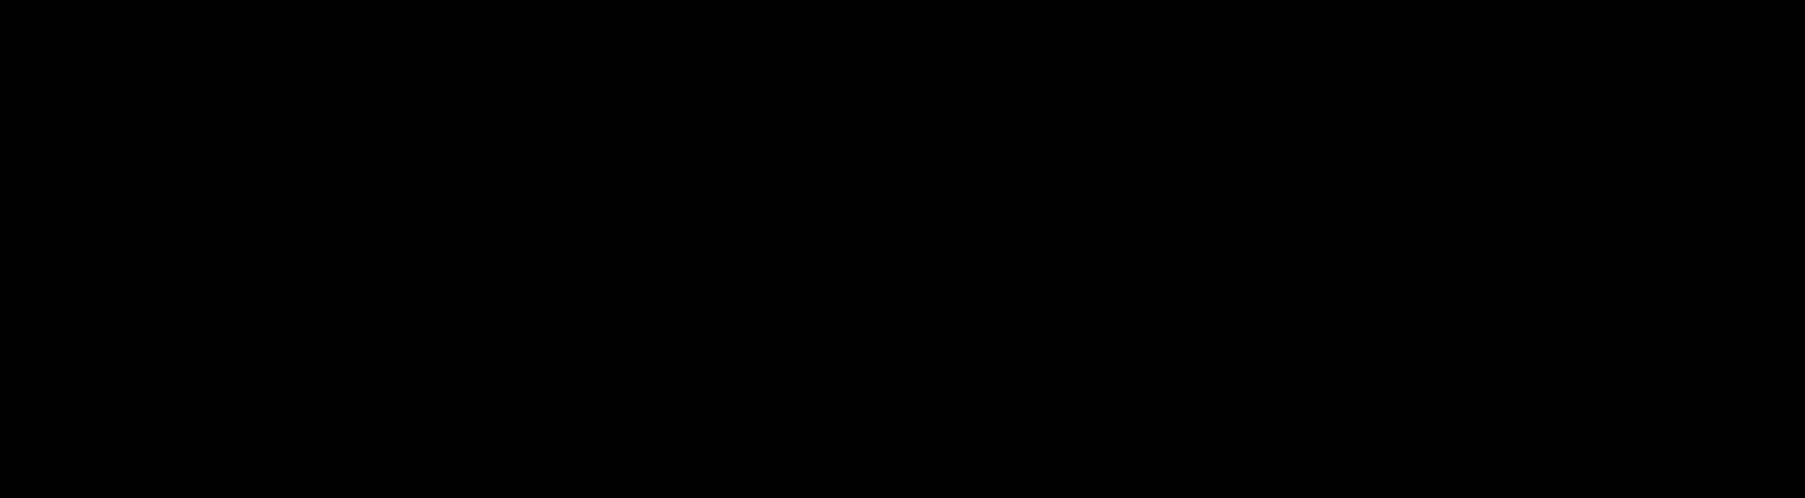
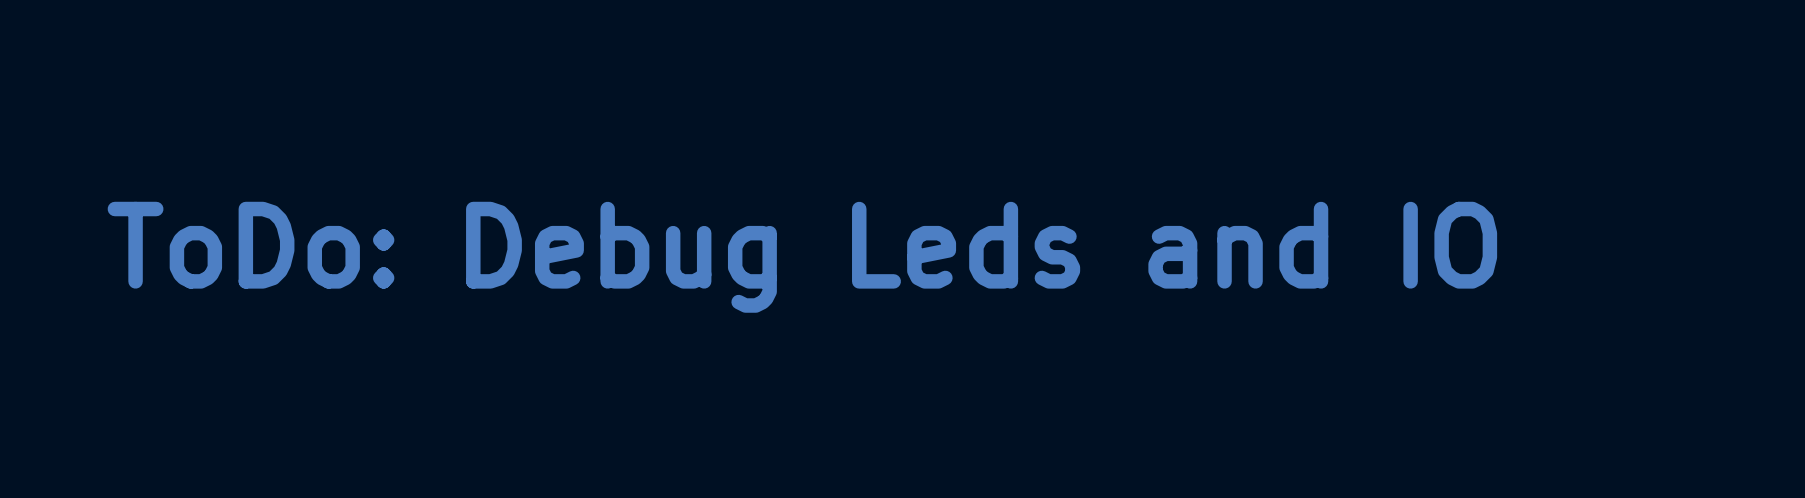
text: none -> ToDo: Debug Leds and IO (802, 257)

